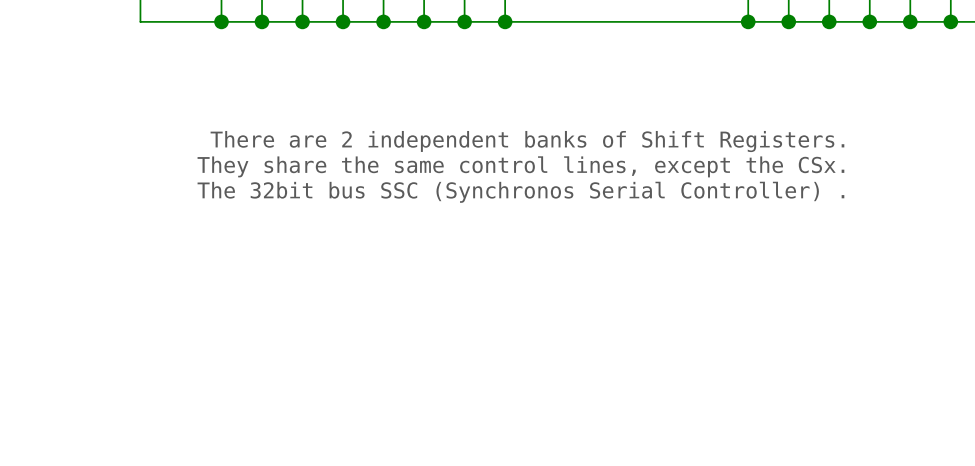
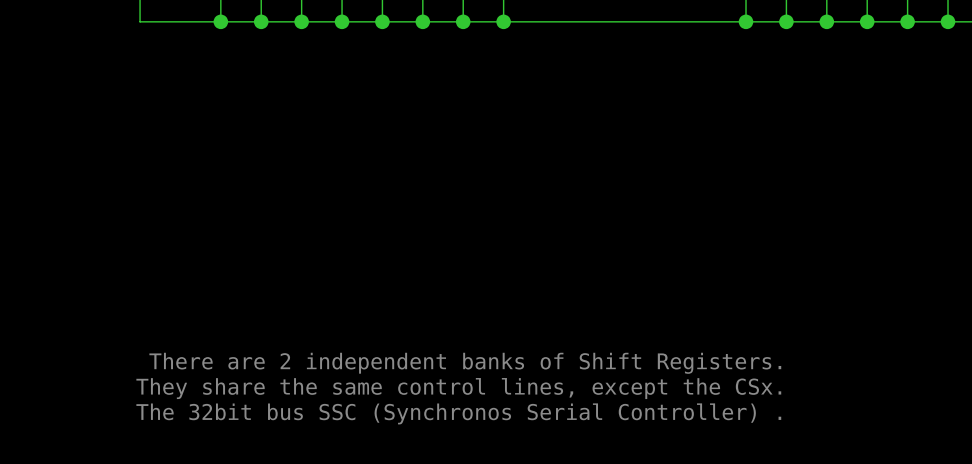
text position: There are 2 independent banks of Shift Registers. (527, 141) -> There are 2 independent banks of Shift Registers. (465, 363)
text position: They share the same control lines, except the CSx. (520, 166) -> They share the same control lines, except the CSx. (458, 388)
text position: The 32bit bus SSC (Synchronos Serial Controller) . (520, 192) -> The 32bit bus SSC (Synchronos Serial Controller) . (458, 413)

